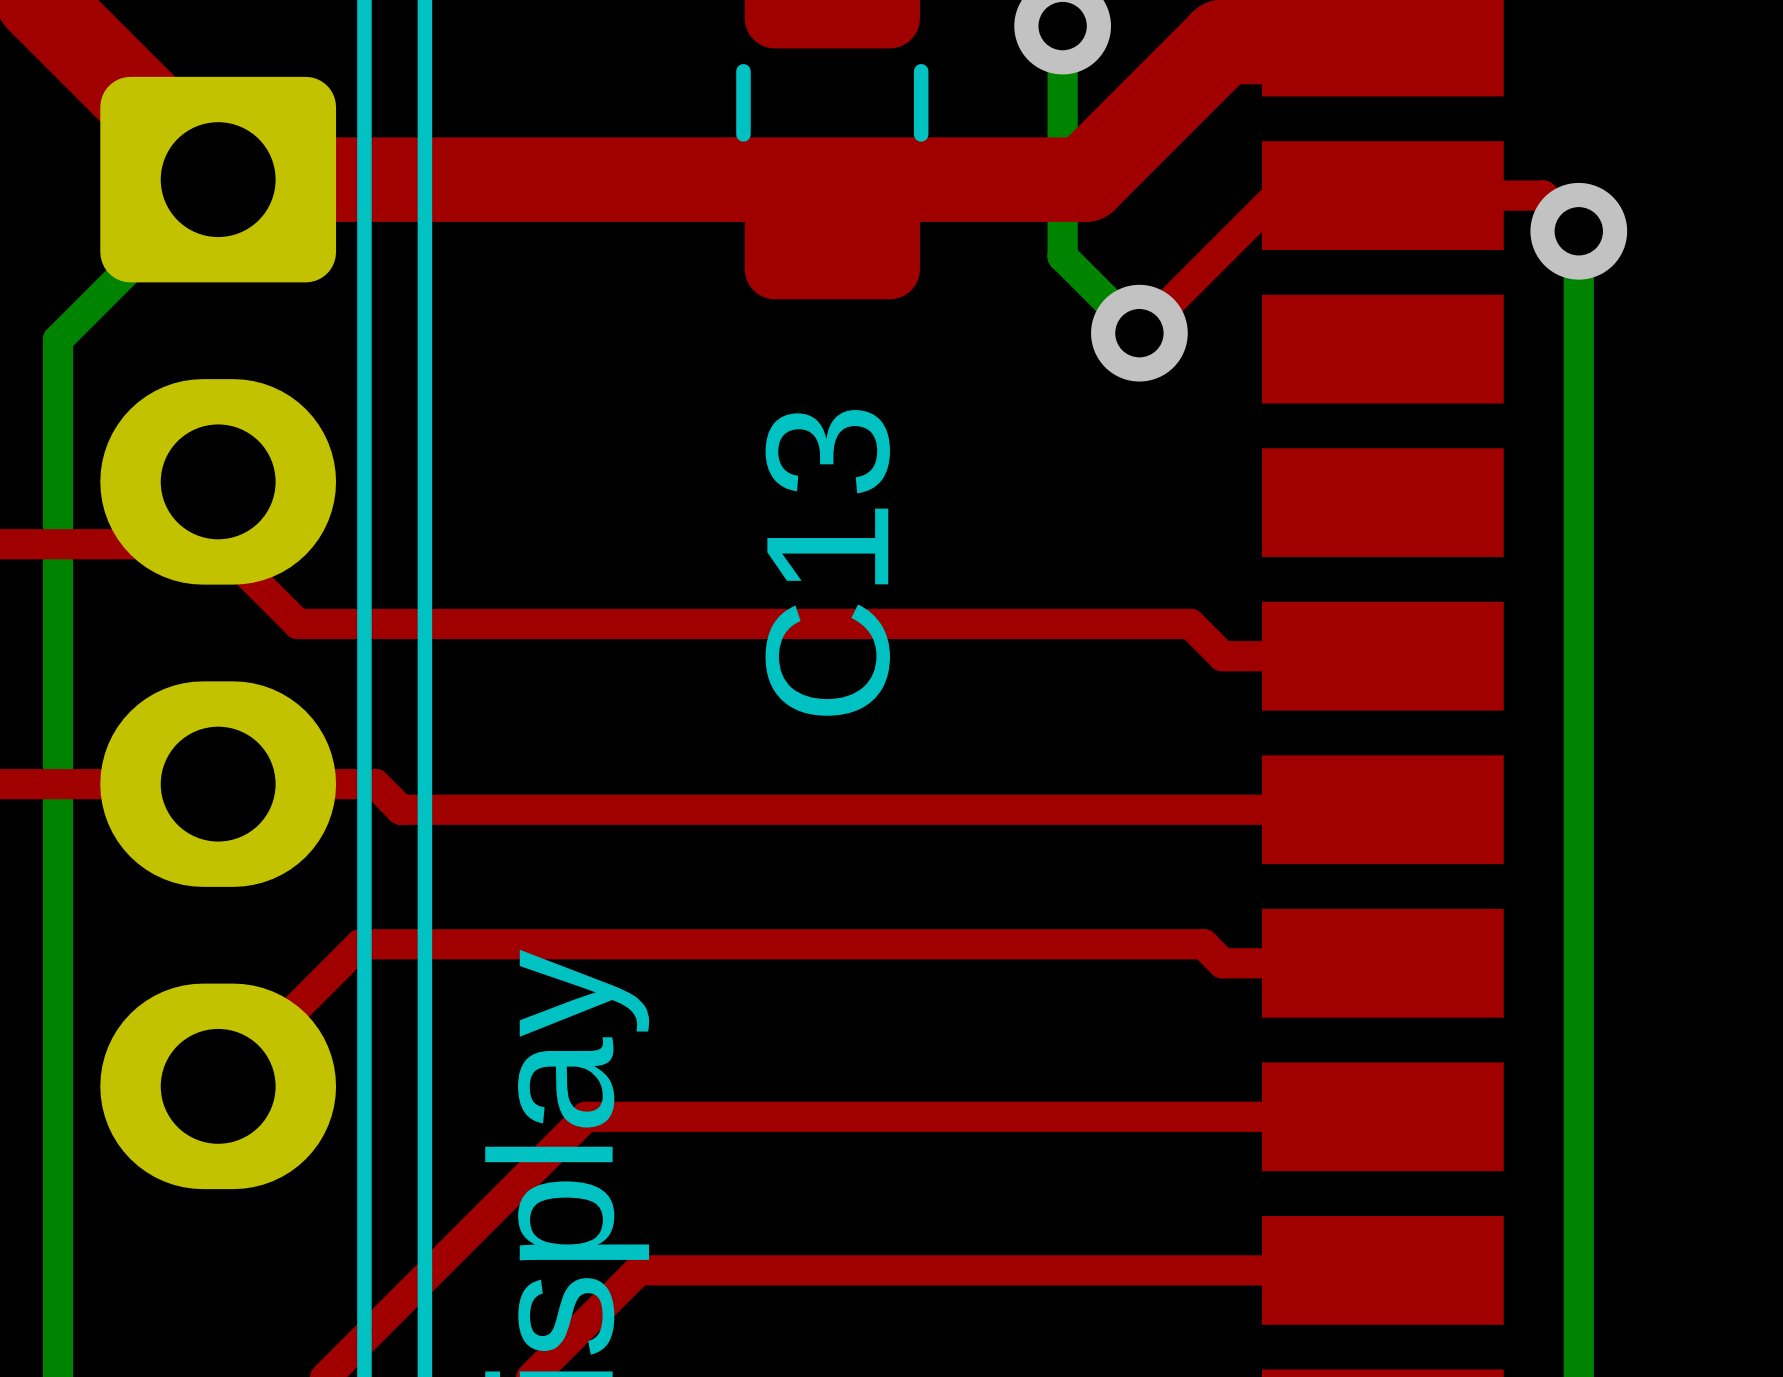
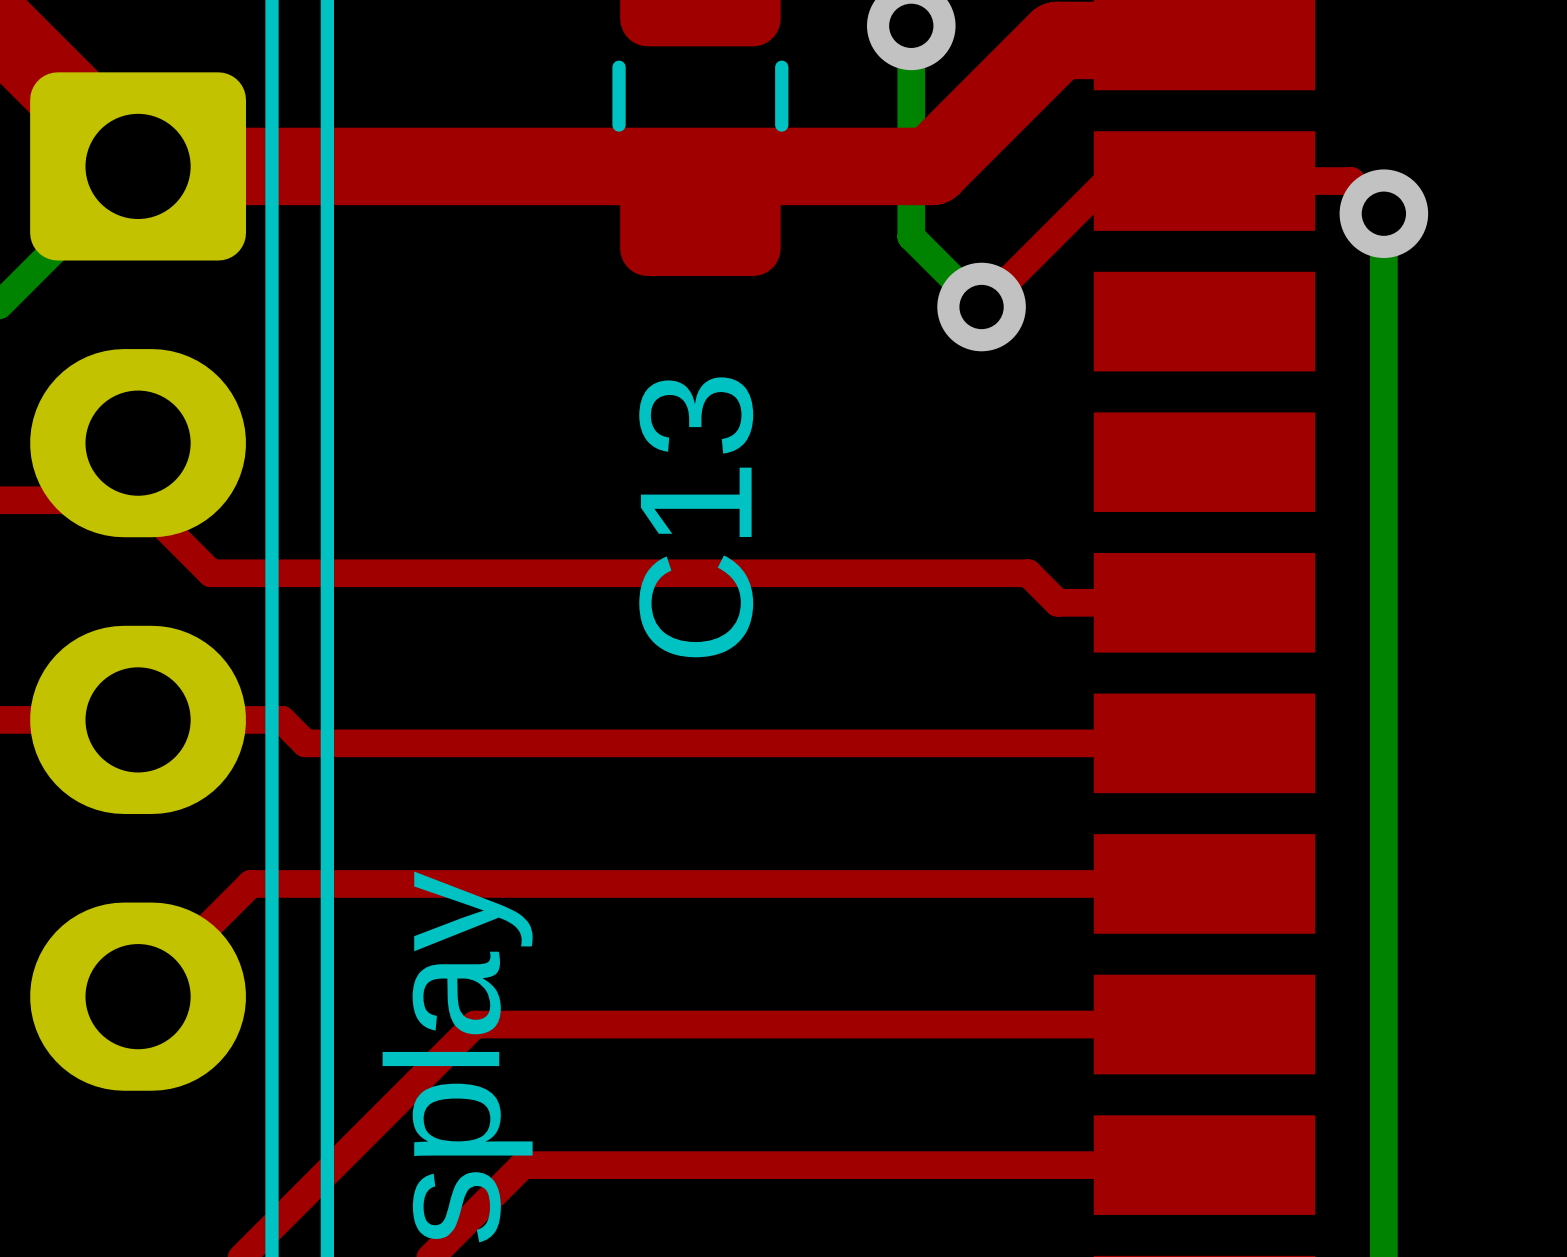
top track: (341, 963) (360, 944) (1203, 944) (1222, 963) -> (250, 883) (1057, 883)

